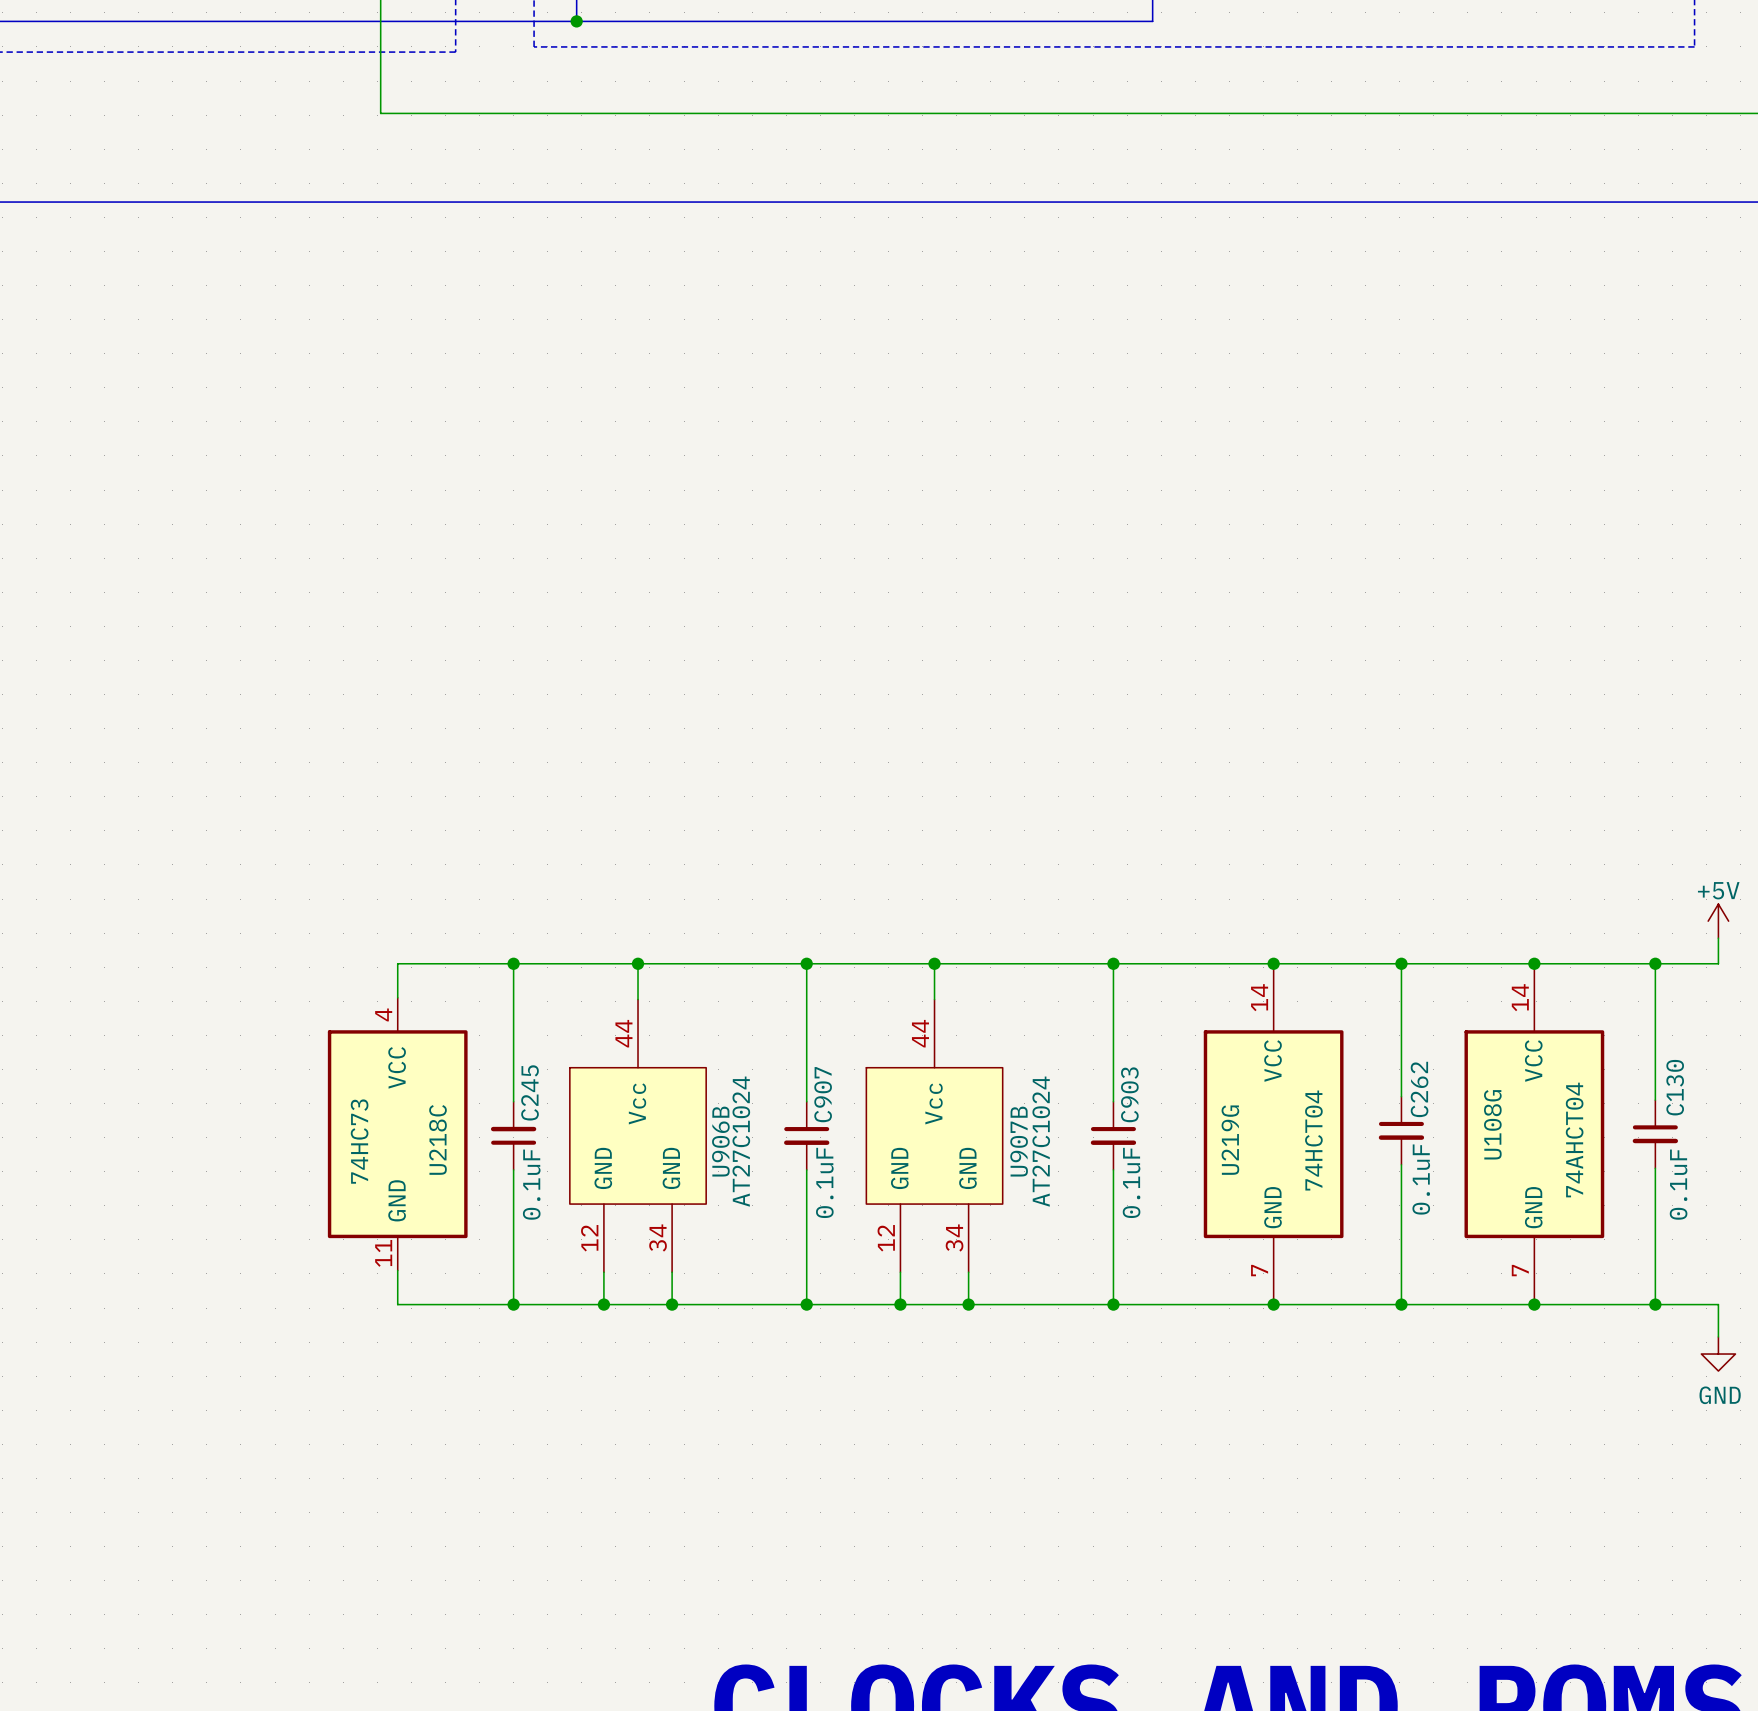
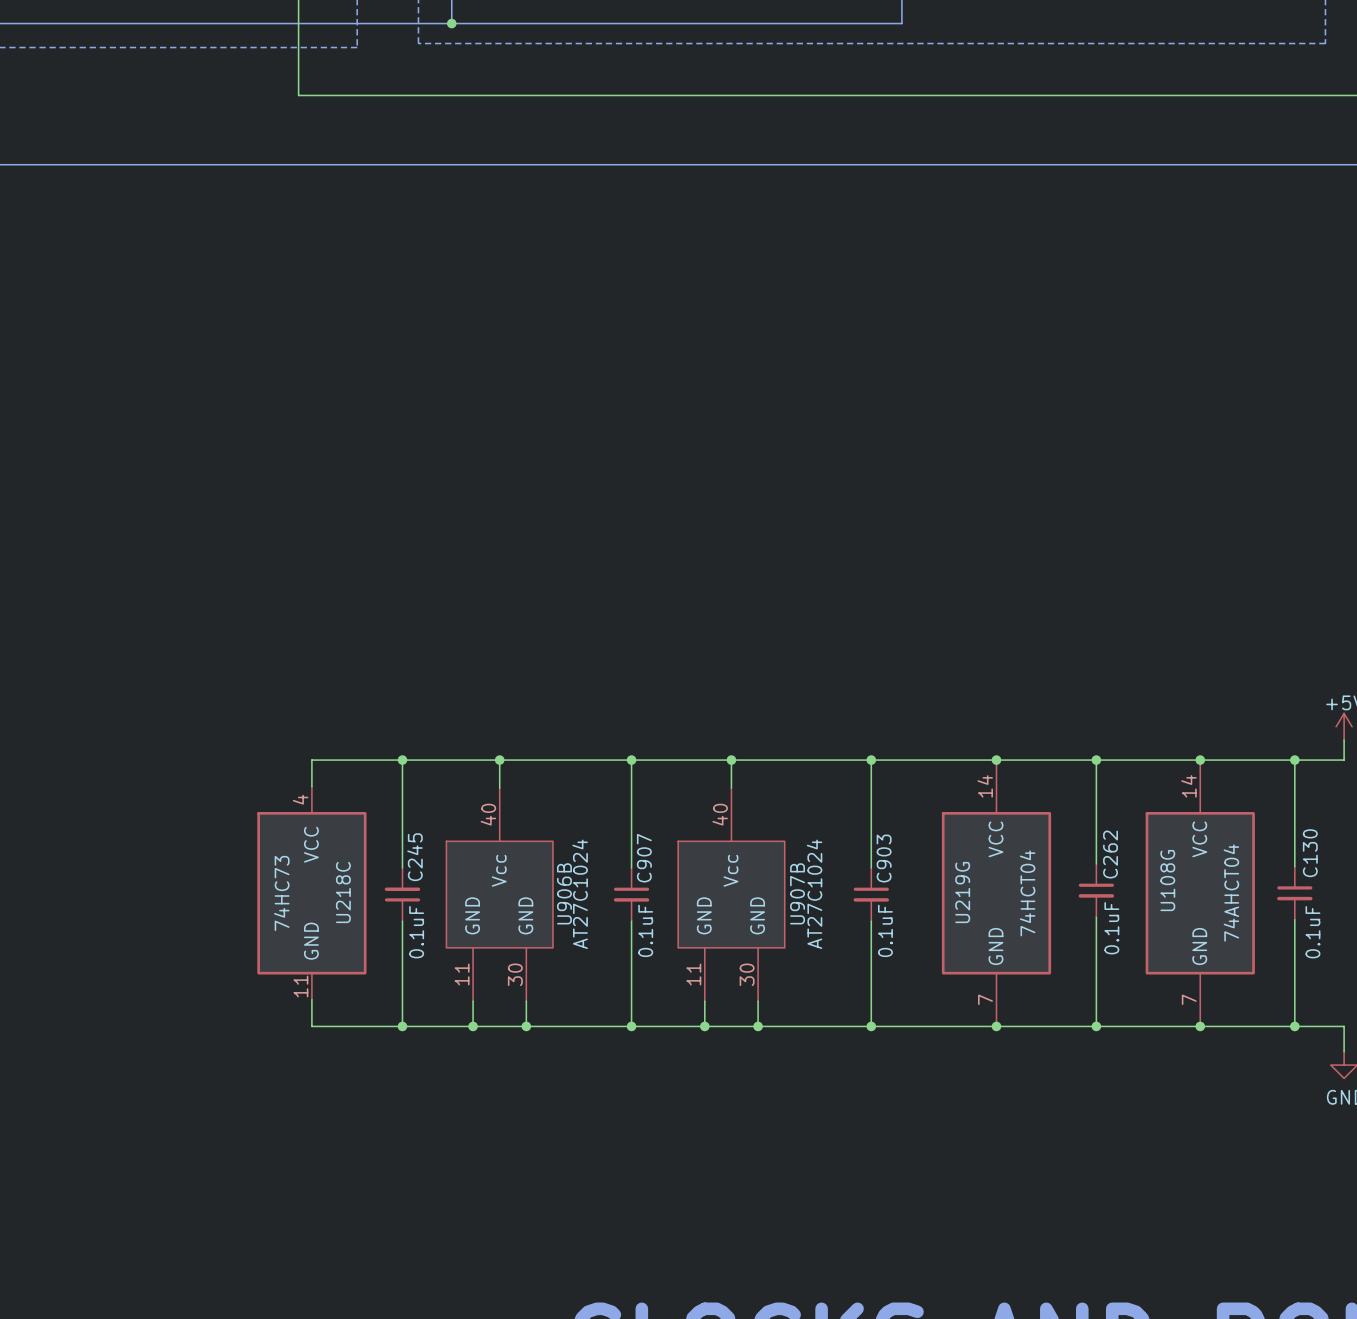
U906B pin number: 44 (623, 1033) -> 40 (488, 814)
U907B pin number: 44 (920, 1033) -> 40 (720, 814)
U906B pin number: 12 (589, 1238) -> 11 (462, 974)
U906B pin number: 34 (658, 1238) -> 30 (515, 974)
U907B pin number: 12 (886, 1238) -> 11 (693, 974)
U907B pin number: 34 (954, 1238) -> 30 (747, 974)

